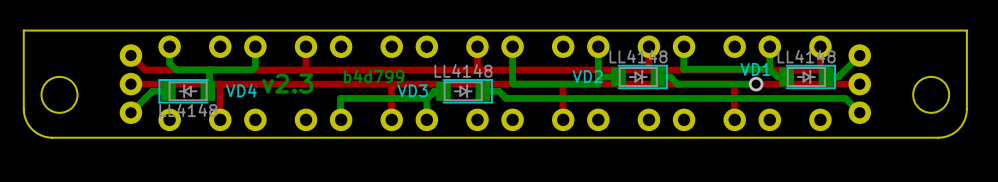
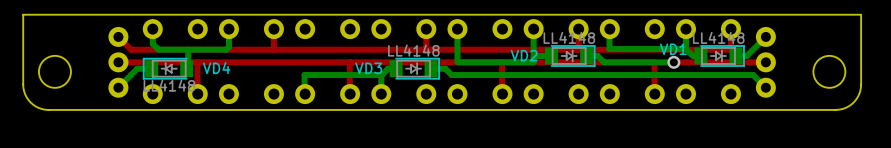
text: b4d799 (374, 76) -> none
text: v2.3 (287, 83) -> none

